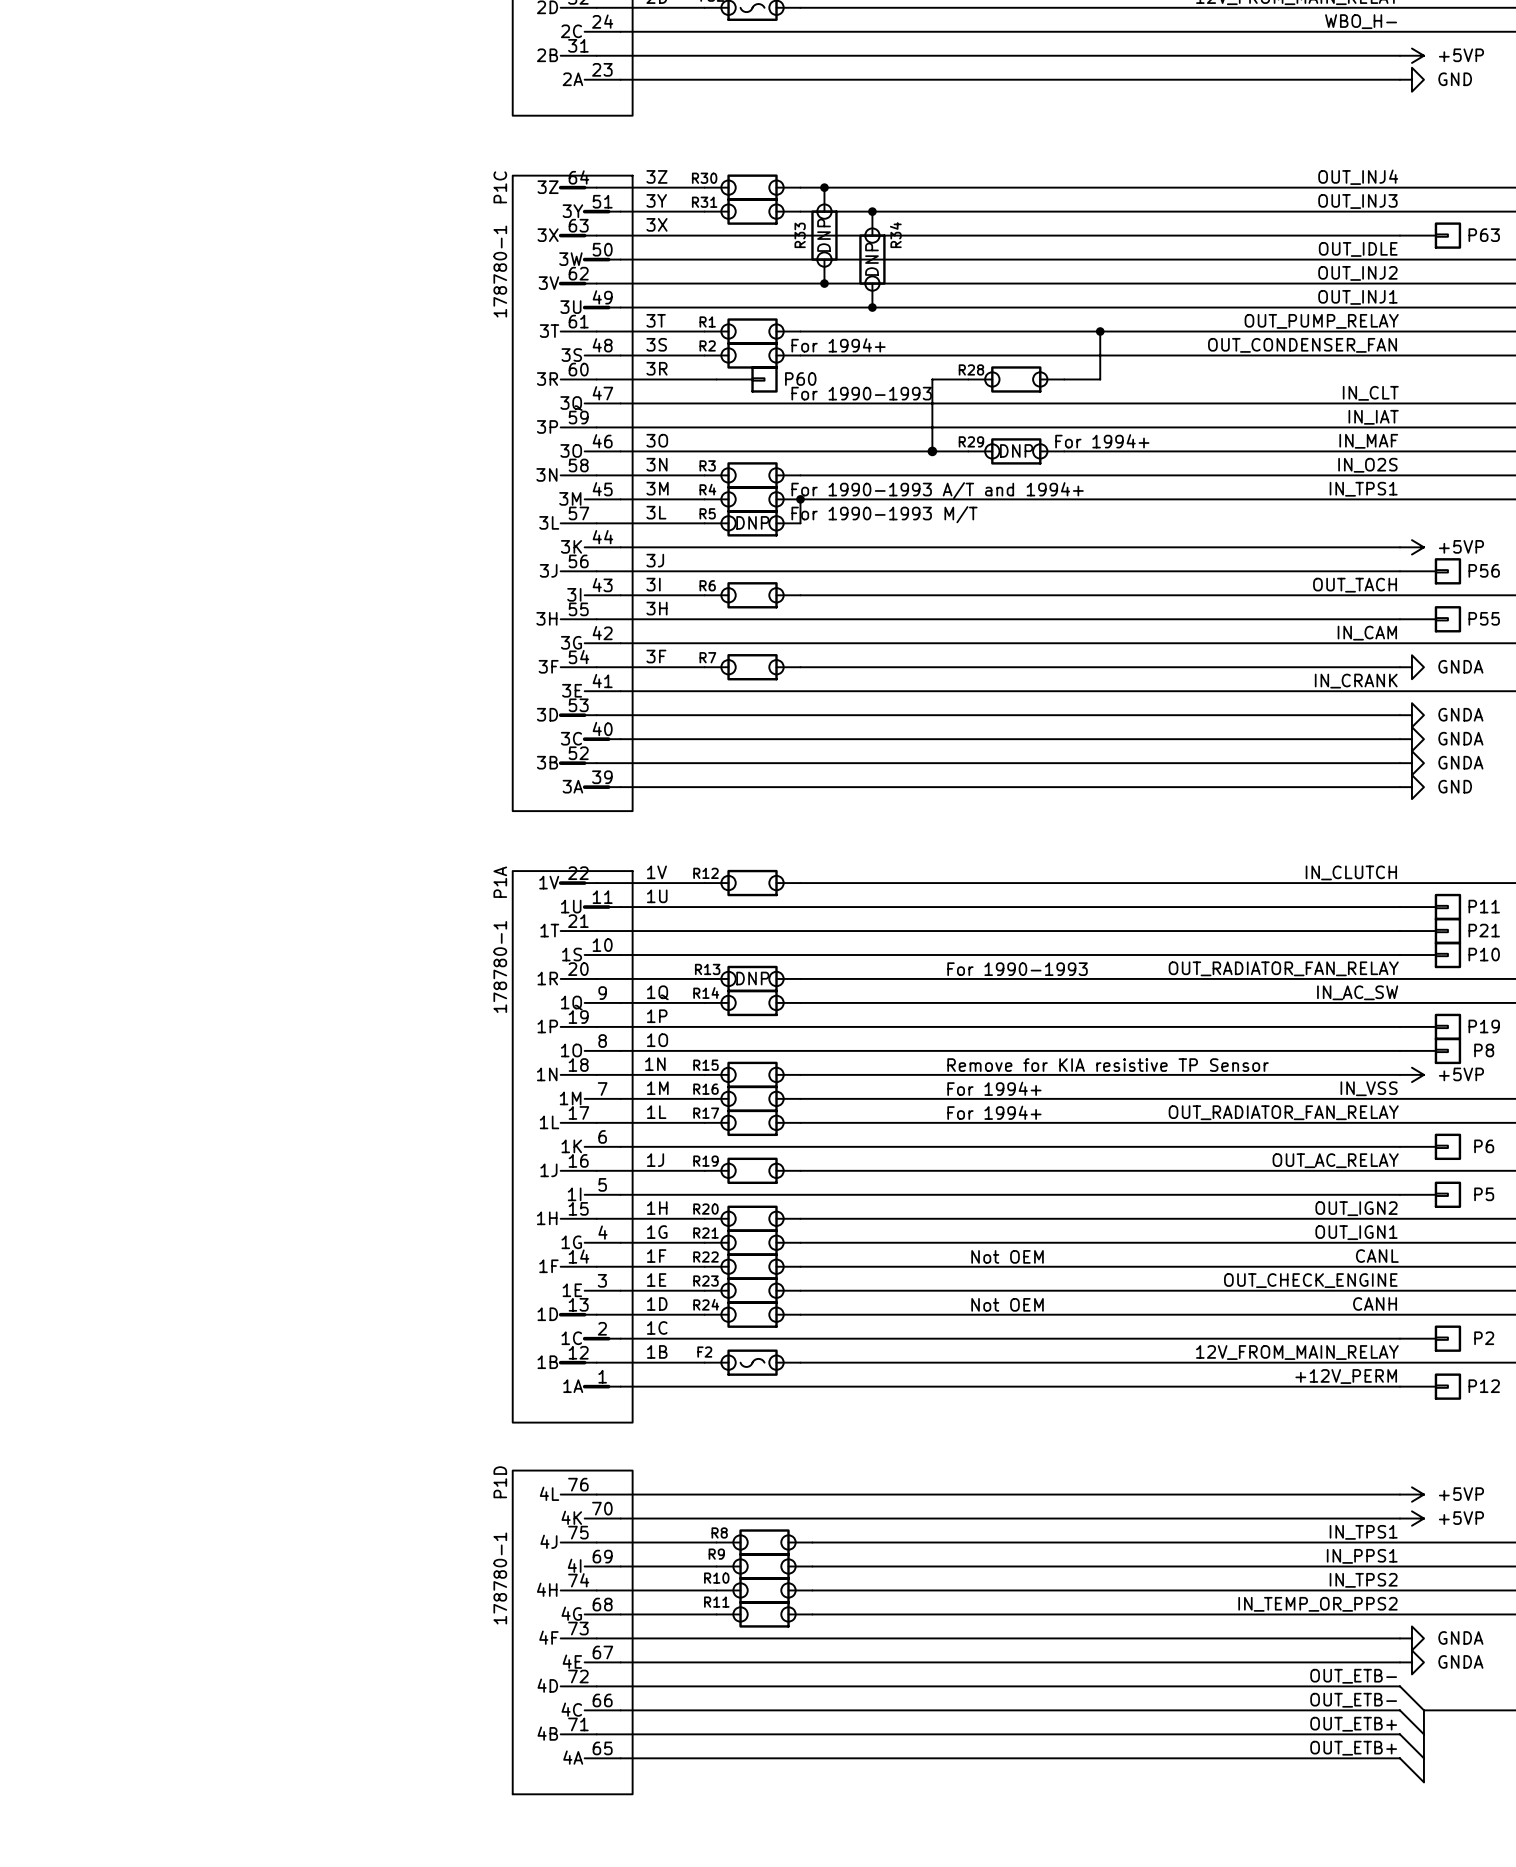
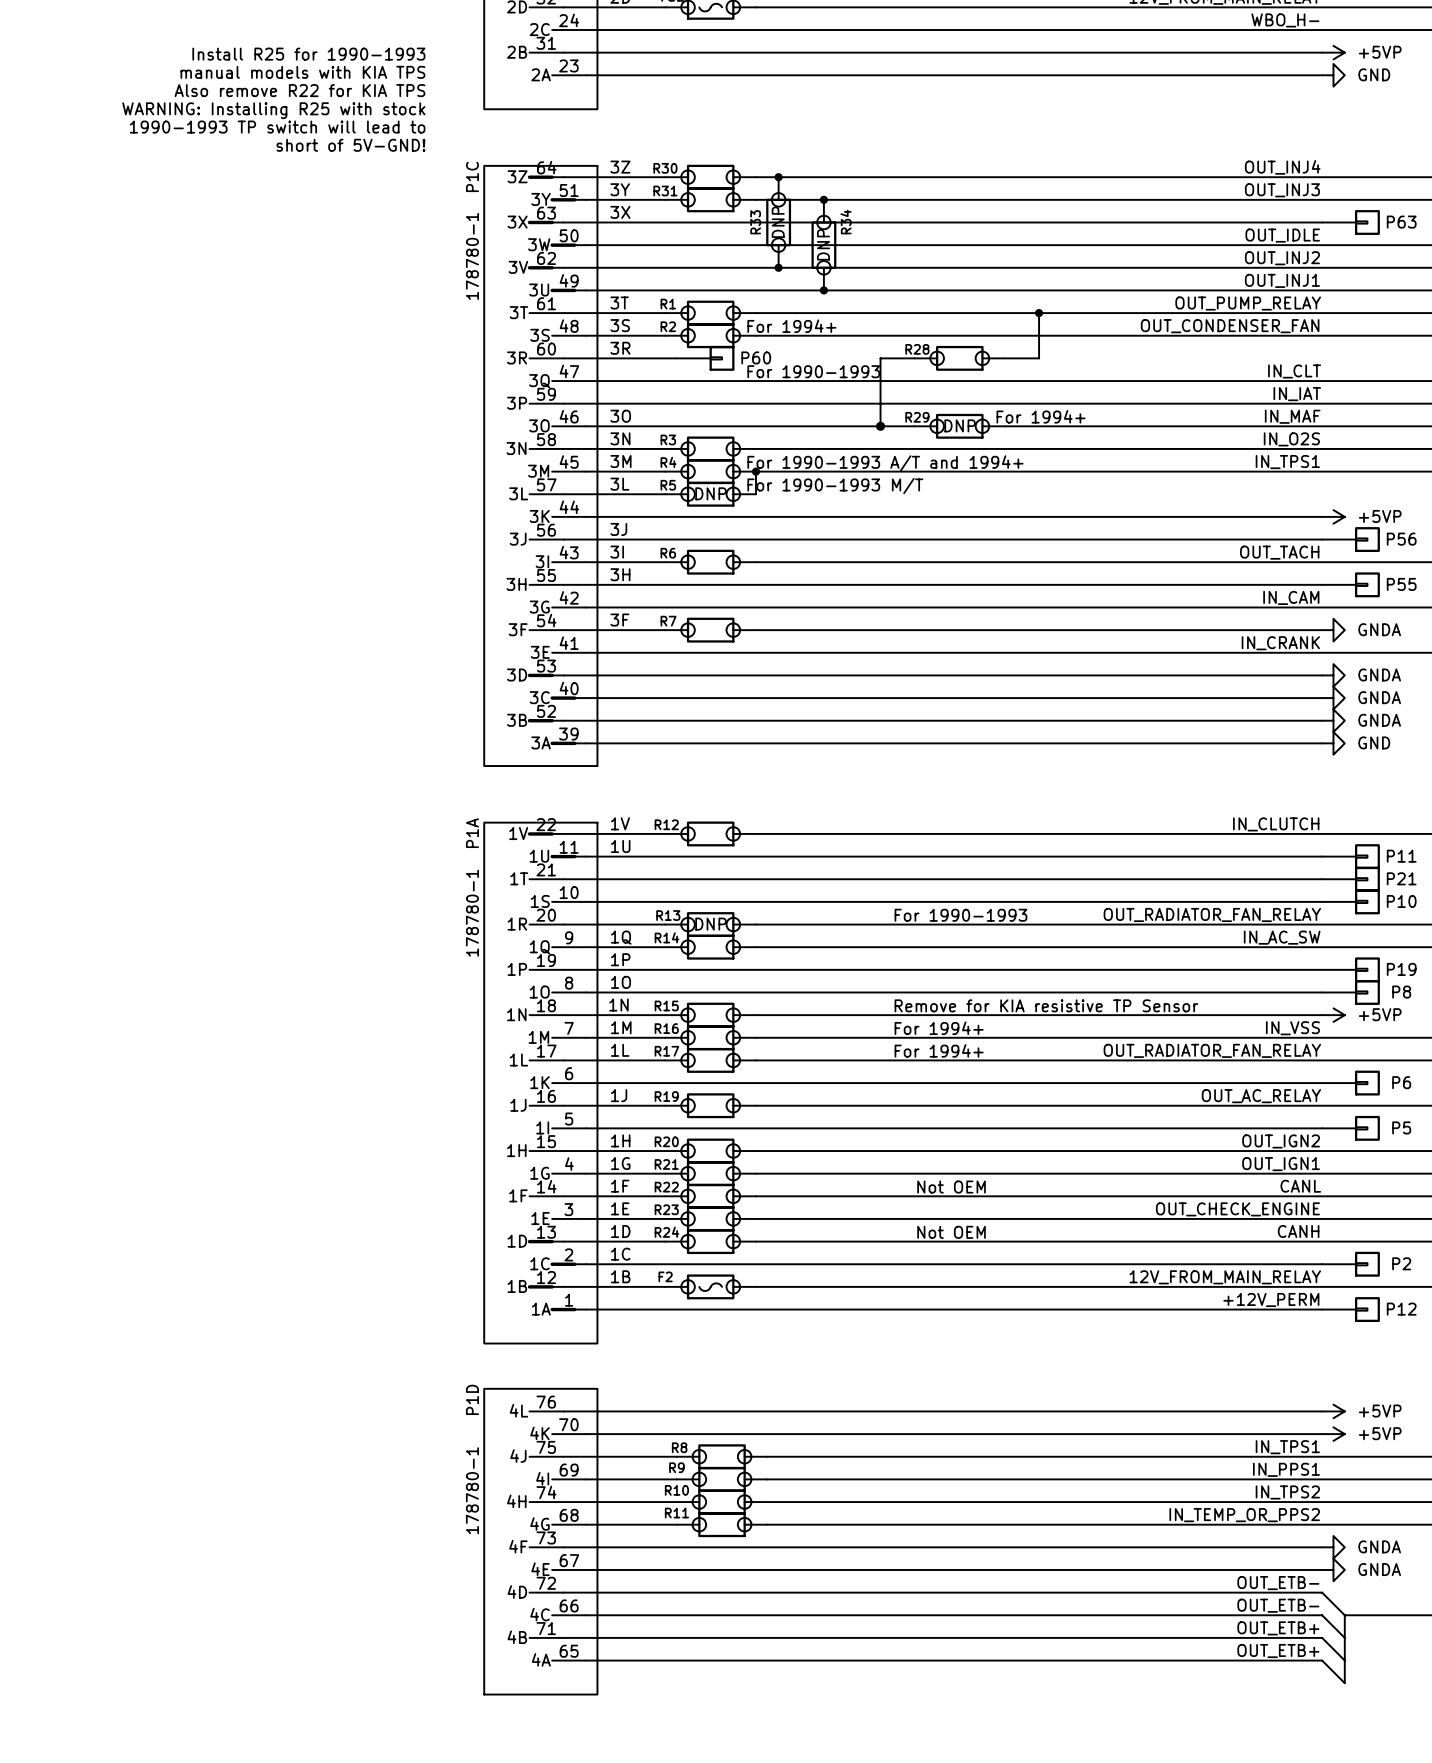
text: none -> Install R25 for 1990-1993 (308, 54)
text: none -> manual models with KIA TPS (302, 72)
text: none -> Also remove R22 for KIA TPS (299, 90)
text: none -> WARNING: Installing R25 with stock (273, 110)
text: none -> 1990-1993 TP switch will lead to (277, 127)
text: none -> short of 5V-GND! (350, 145)

